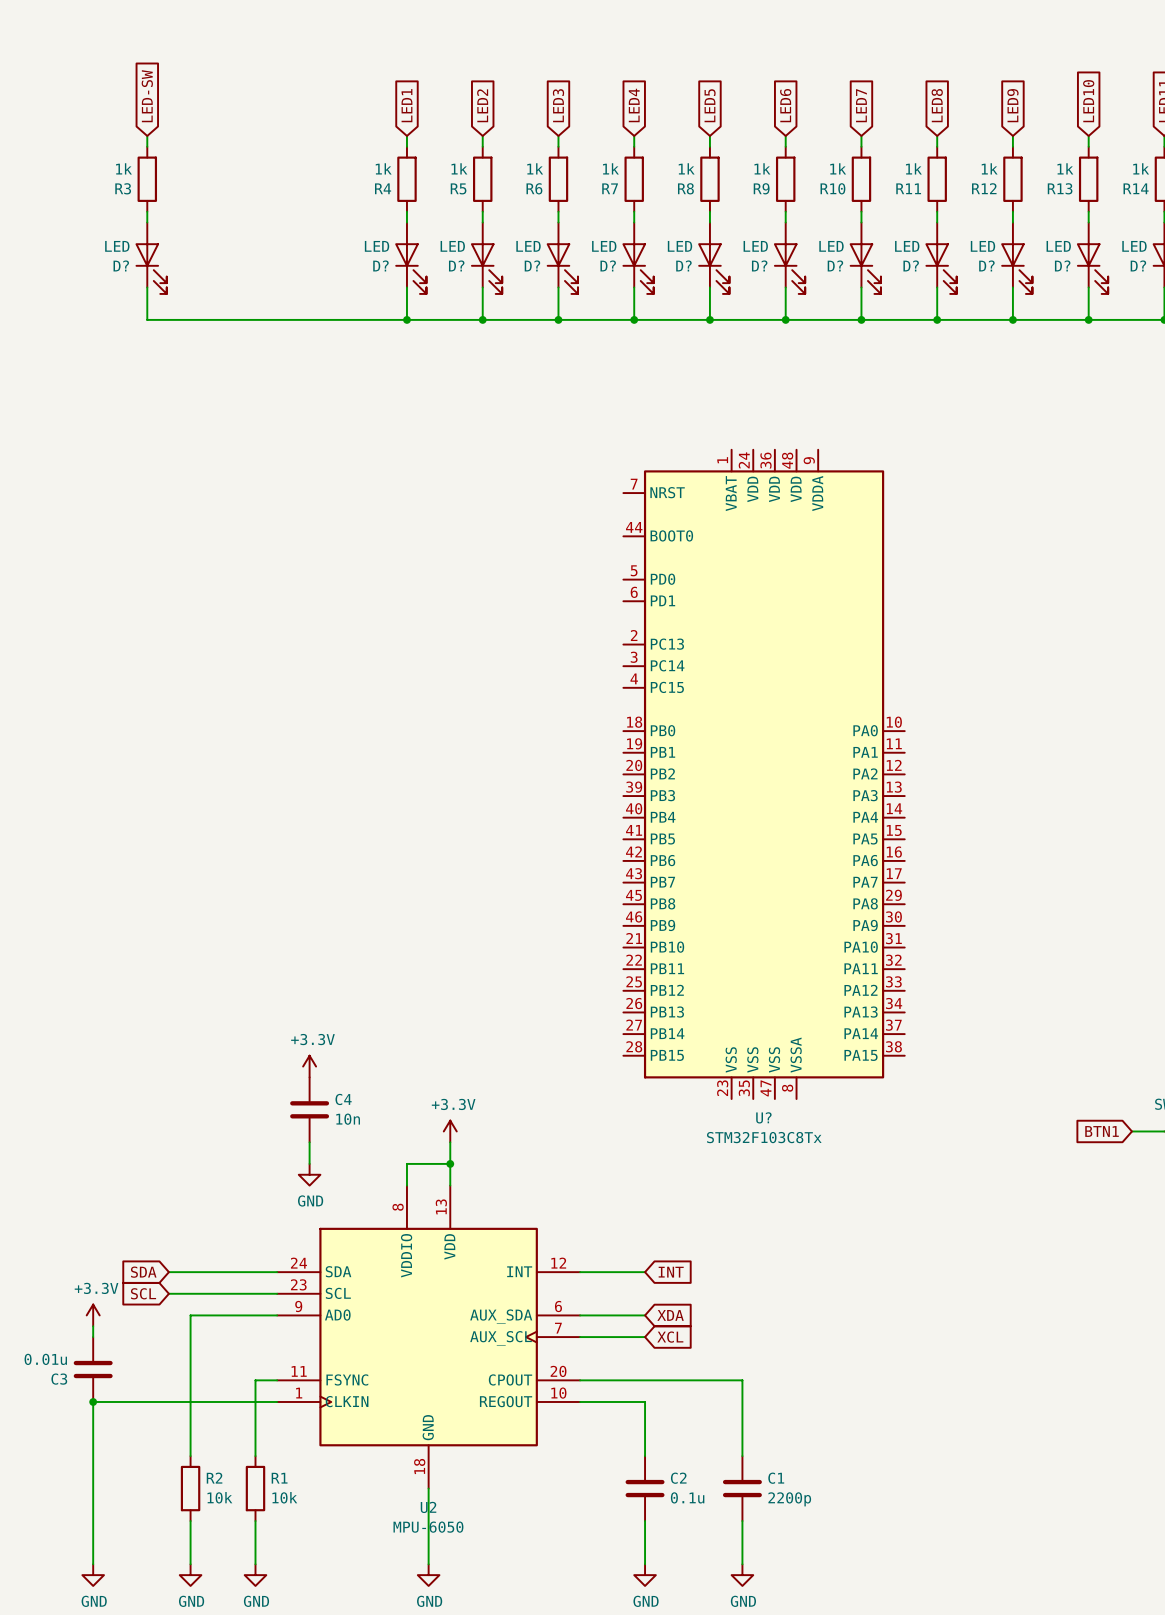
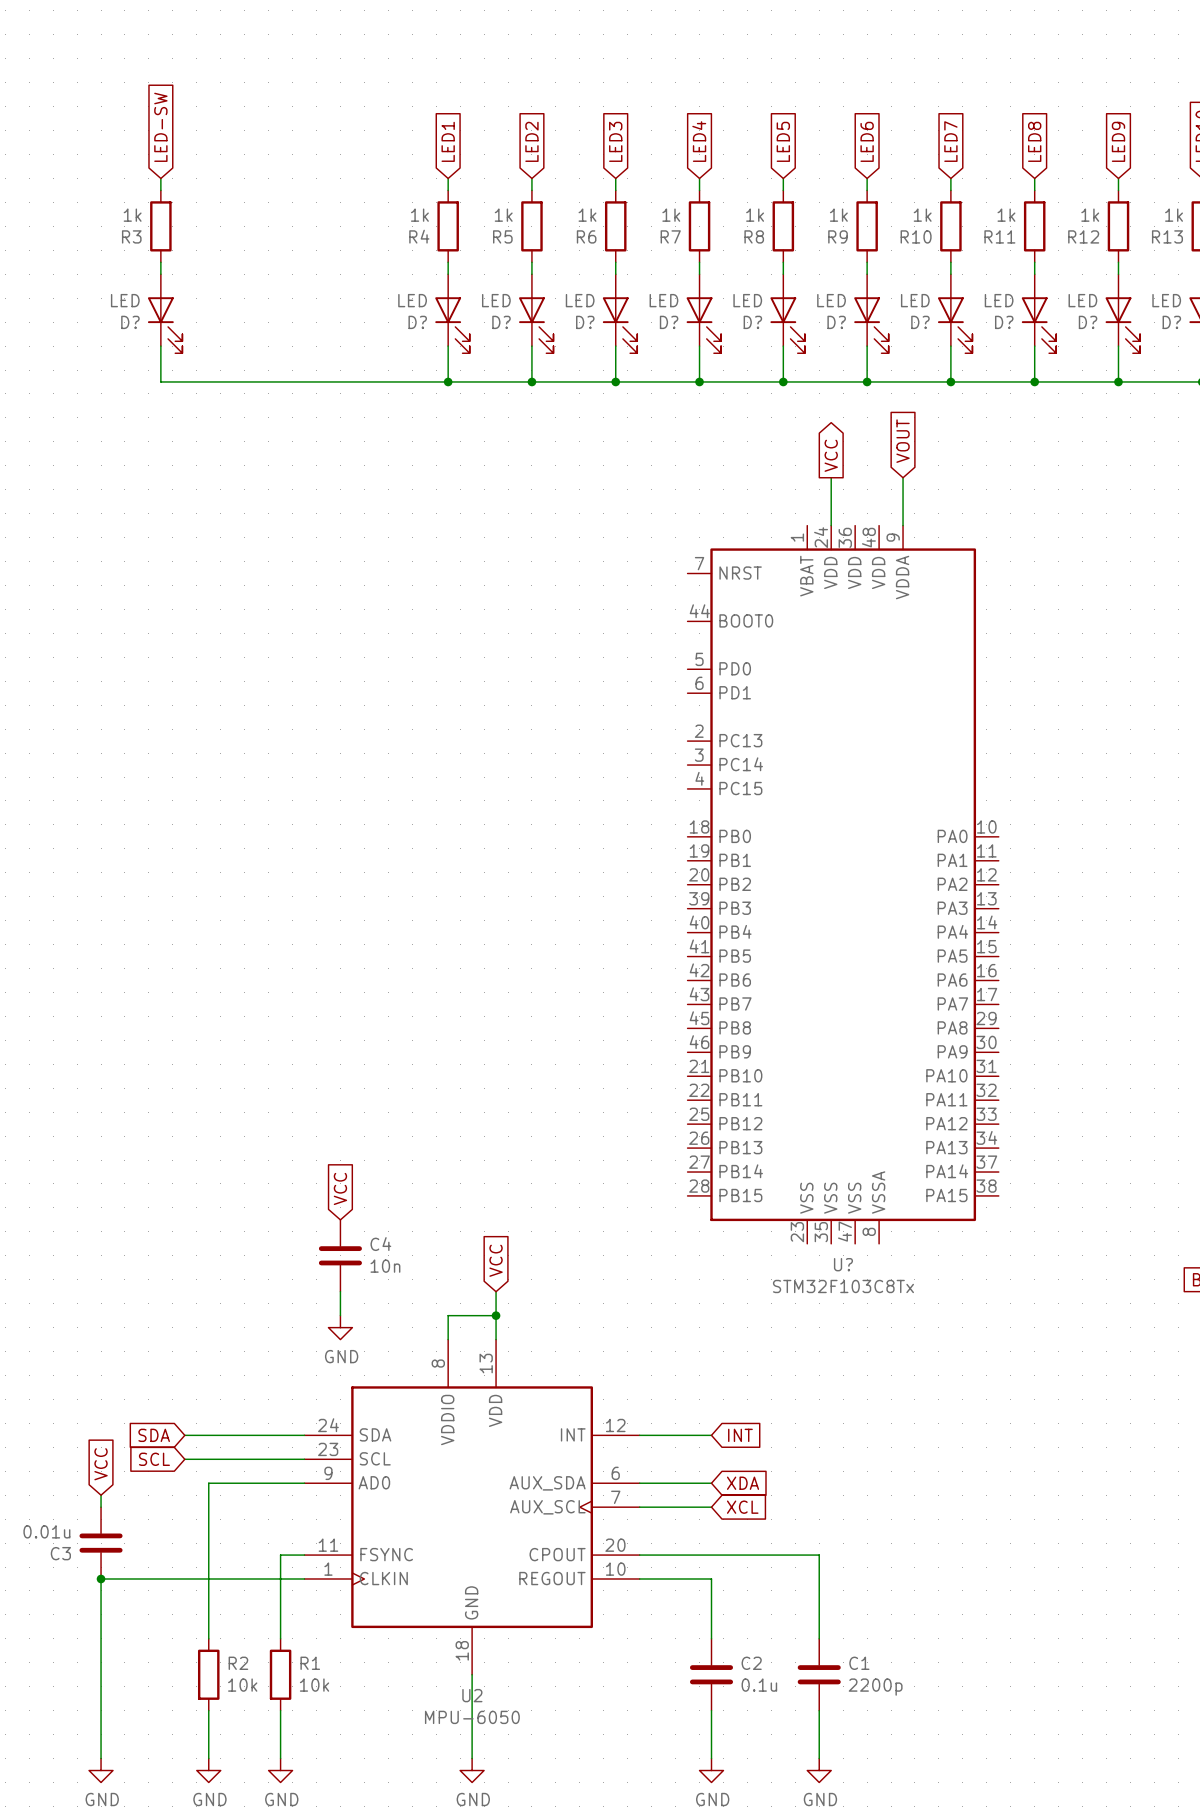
global label: none -> VOUT (903, 441)
global label: none -> VCC (831, 455)
wire: none -> (831, 477) (831, 525)
wire: none -> (903, 477) (903, 525)
global label: none -> VCC (340, 1188)
power symbol: +3.3V (309, 1066) -> none
global label: none -> VCC (496, 1260)
power symbol: +3.3V (450, 1131) -> none
global label: none -> VCC (101, 1464)
power symbol: +3.3V (93, 1315) -> none

